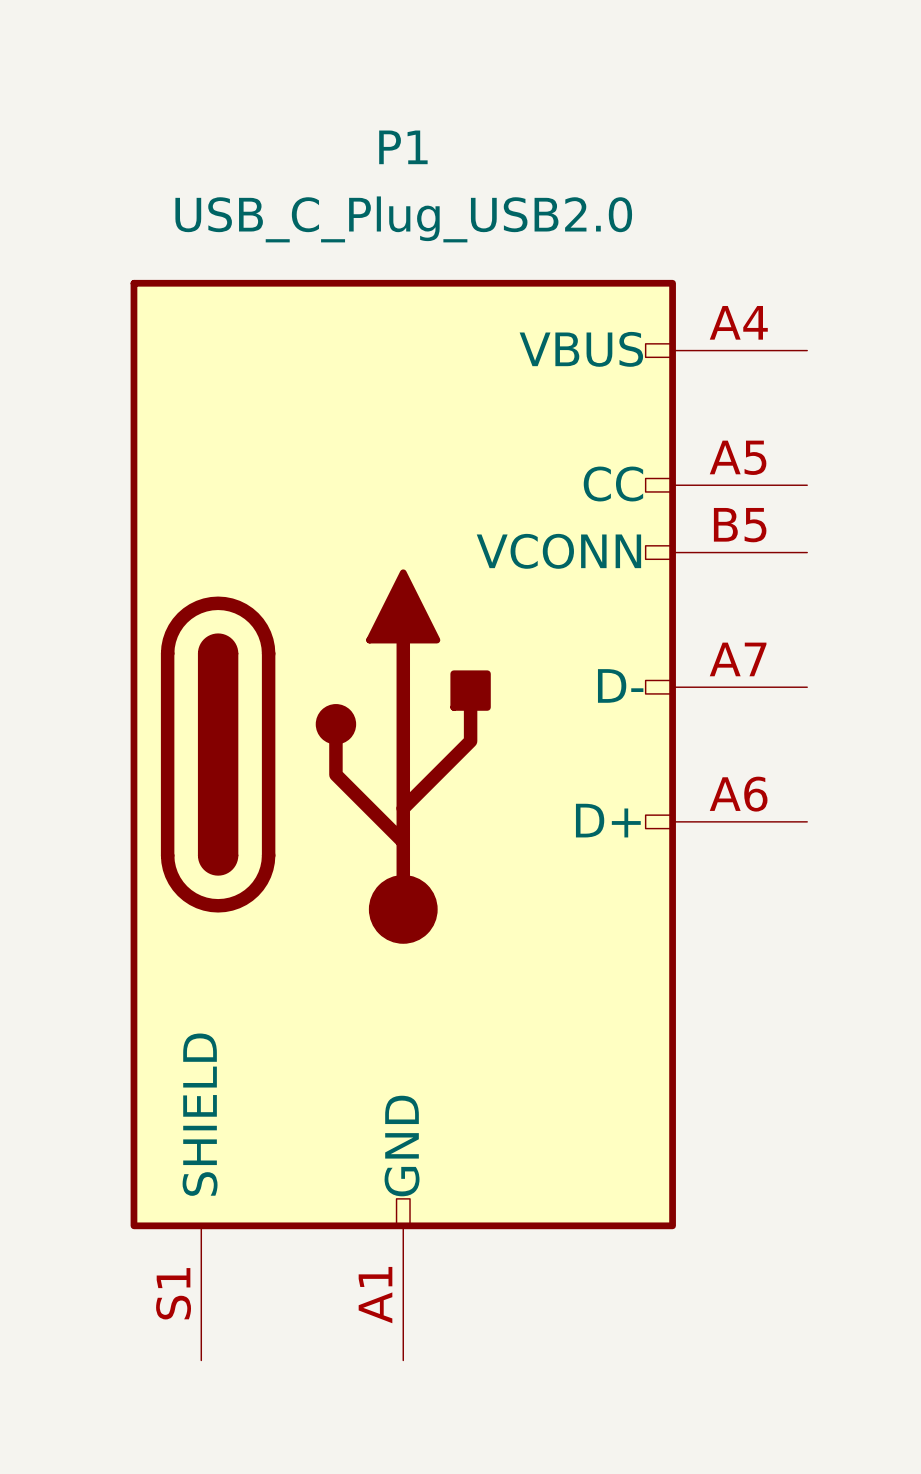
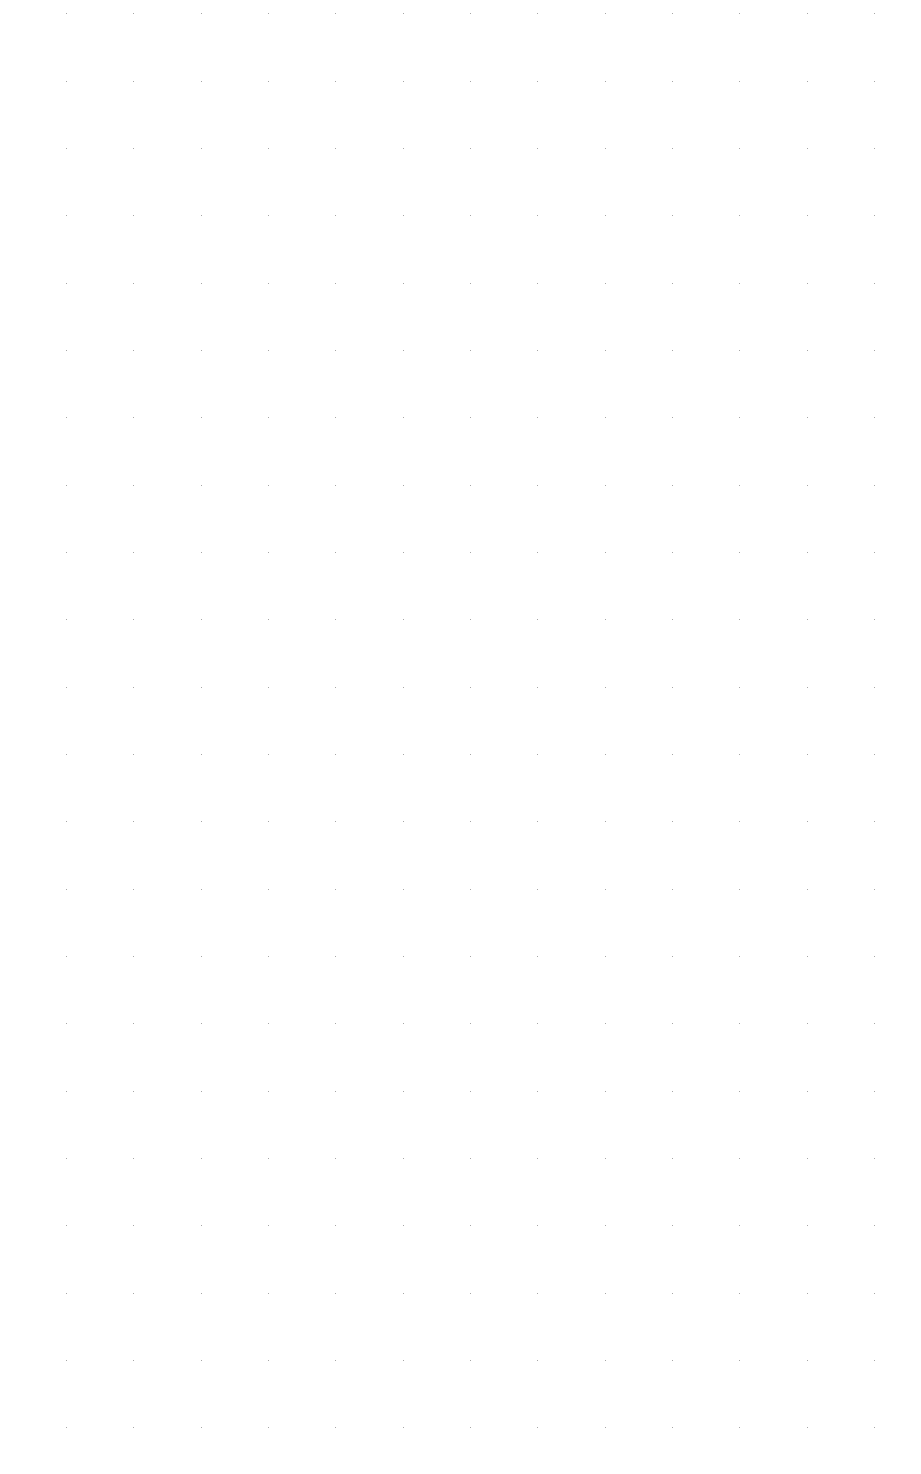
P1: USB_C_Plug_USB2.0 (468, 820) -> none

